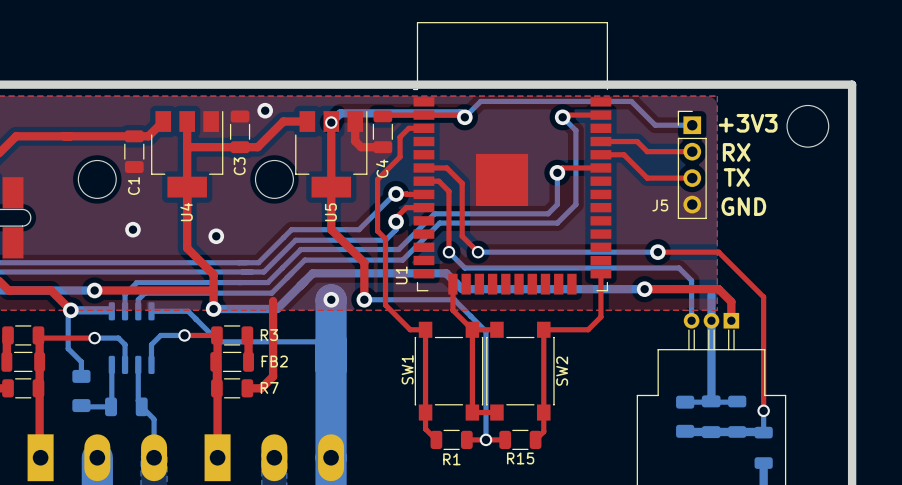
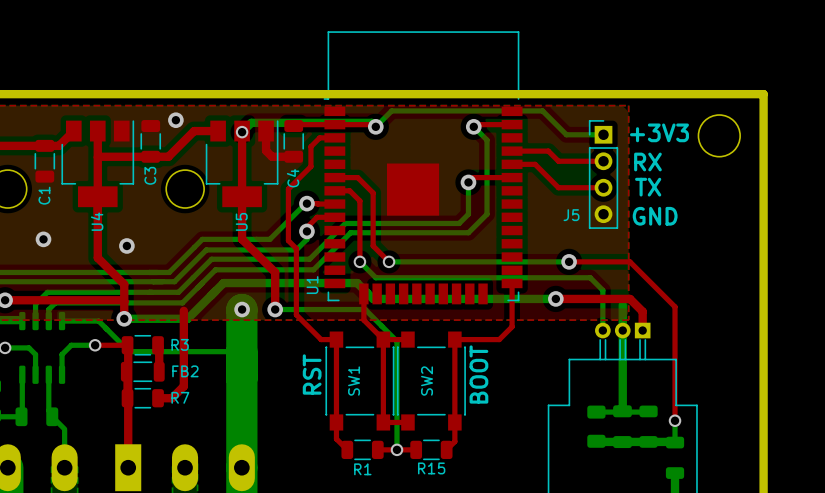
text: none -> RST (312, 374)
text: none -> BOOT (478, 374)
SW1 name position: SW1 (407, 369) -> SW1 (354, 381)
SW2 name position: SW2 (562, 371) -> SW2 (427, 381)

